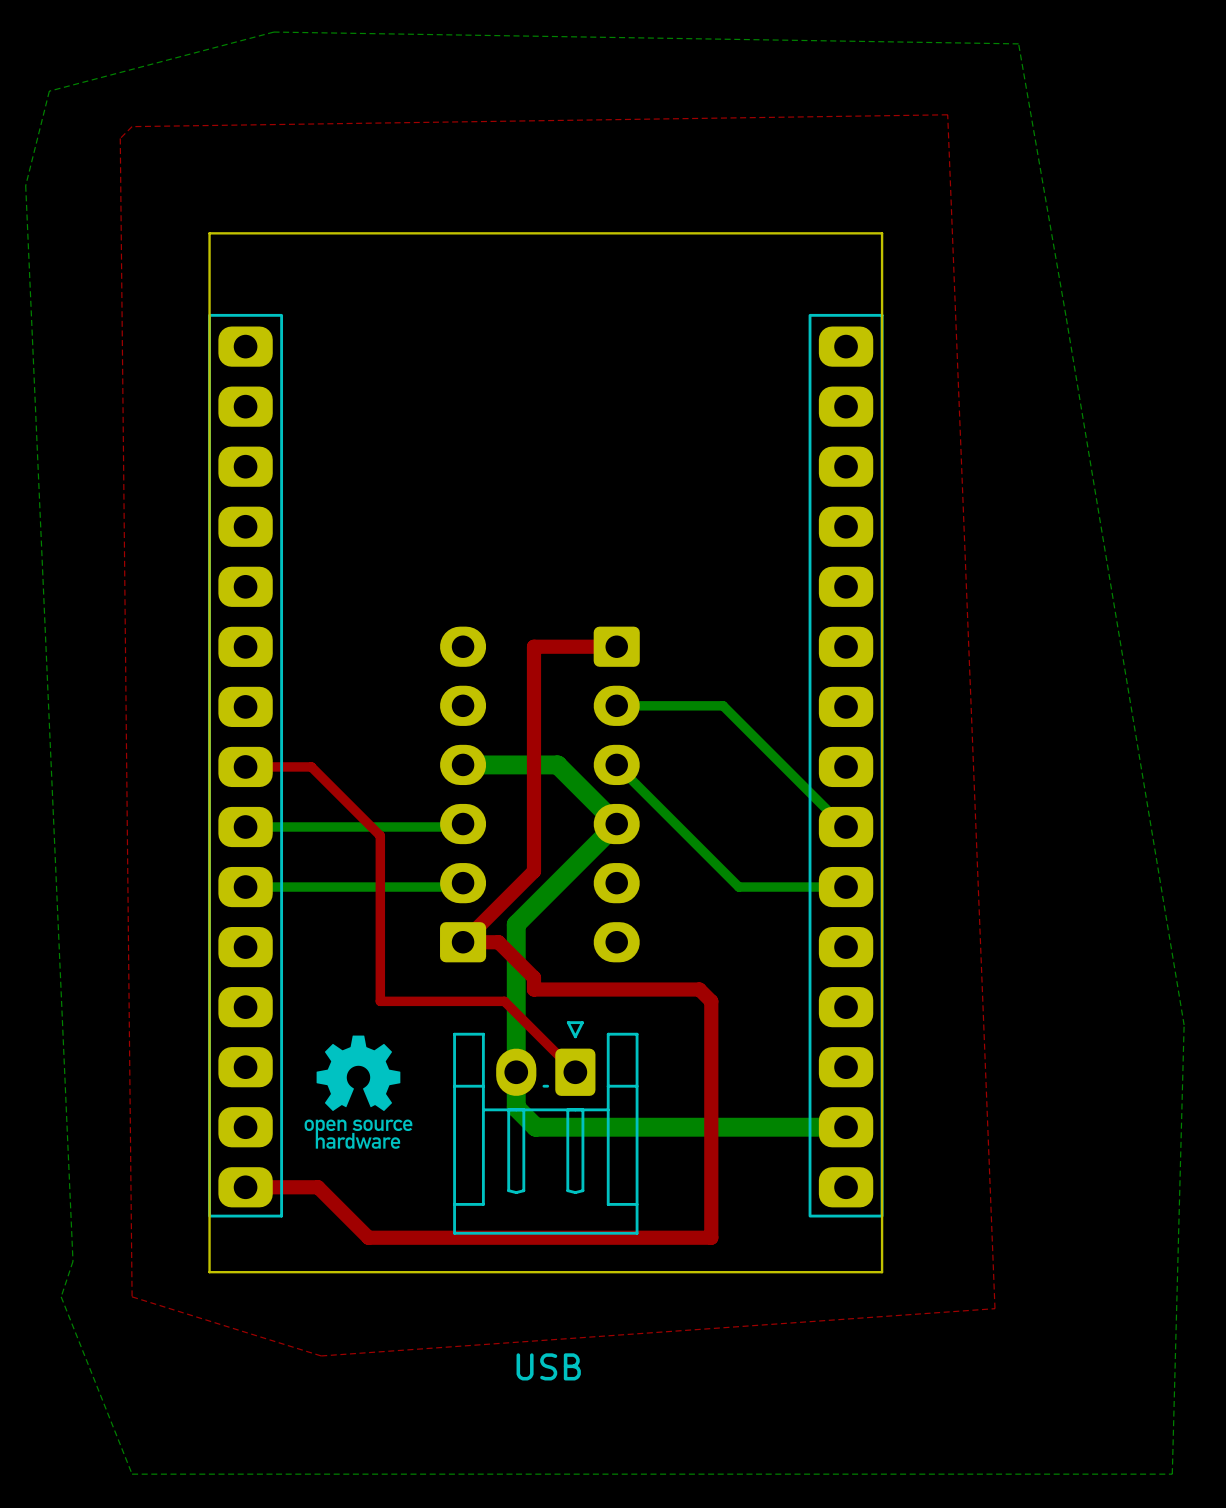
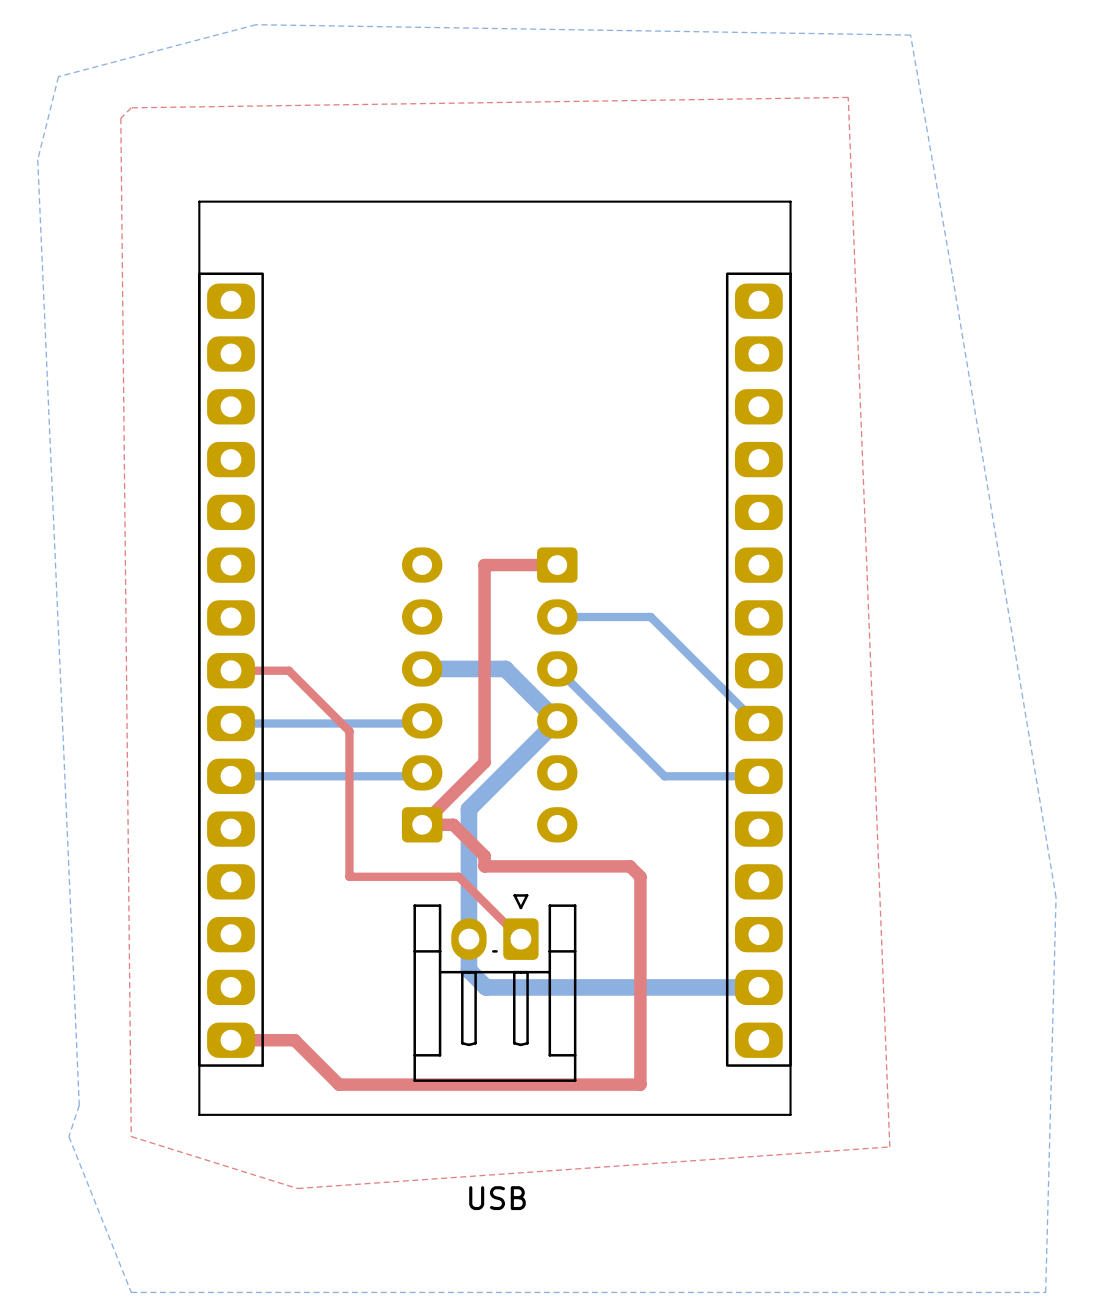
drawing: [304, 1035, 413, 1149] -> none

